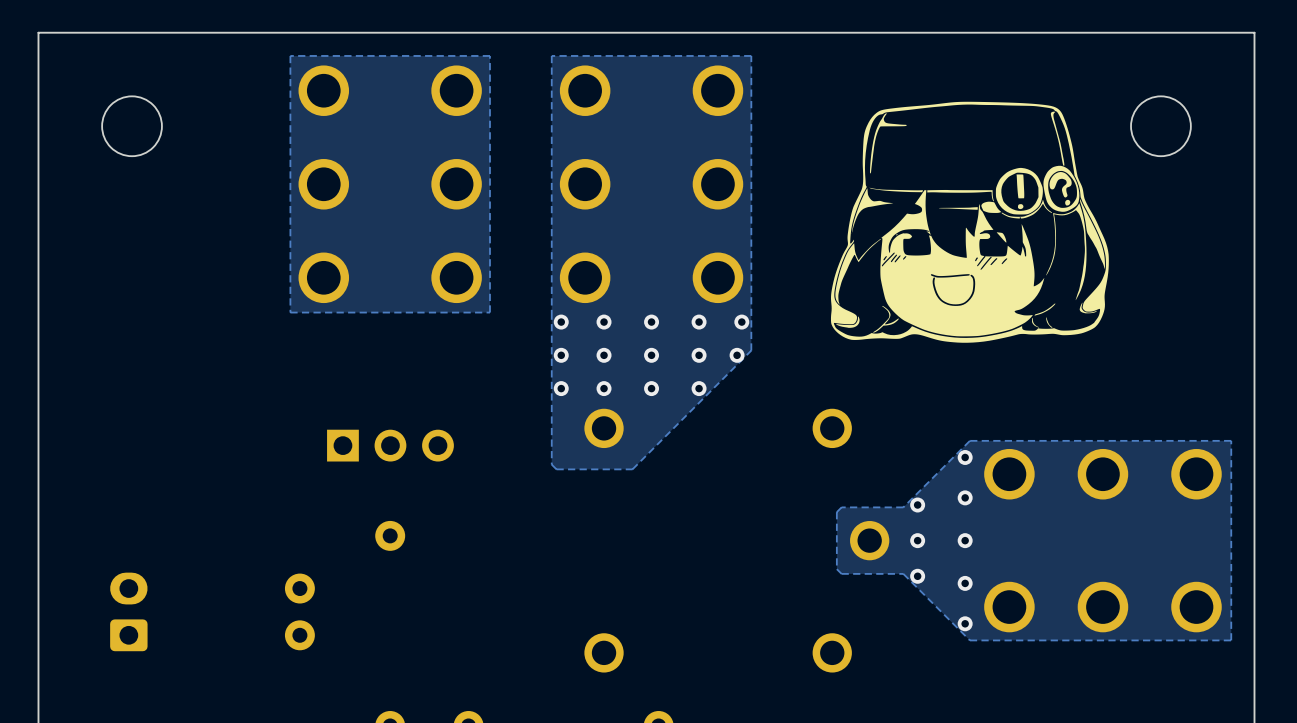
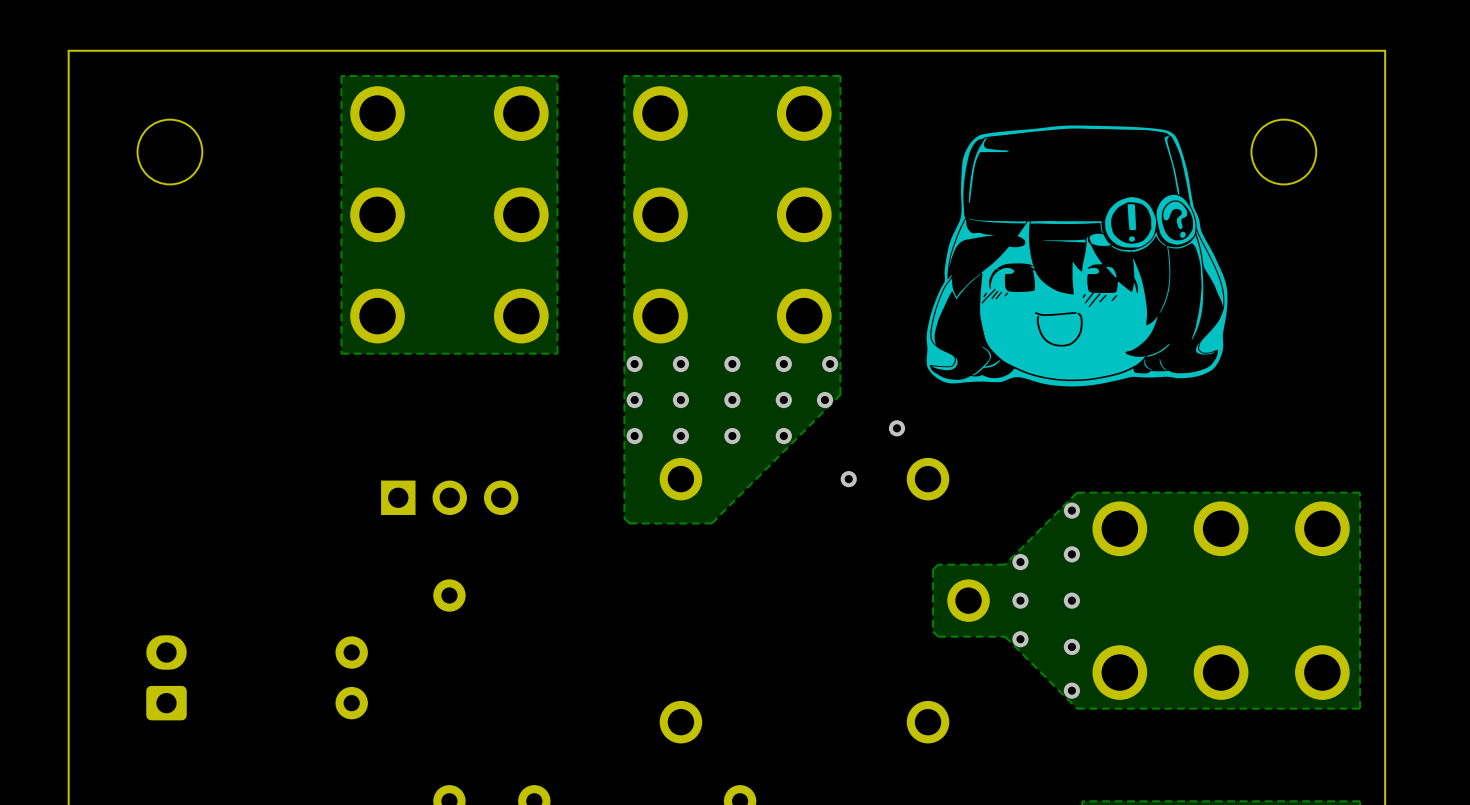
via: none -> (897, 428)
via: none -> (848, 479)

